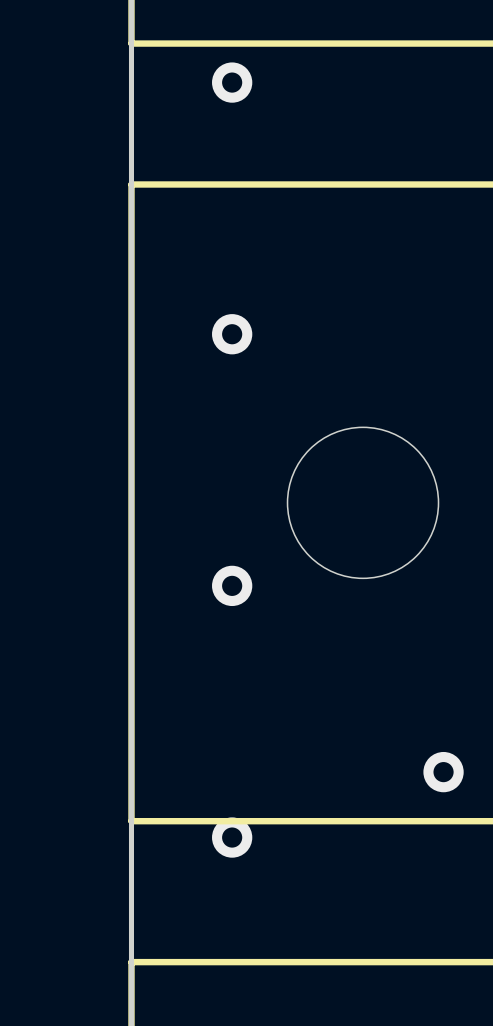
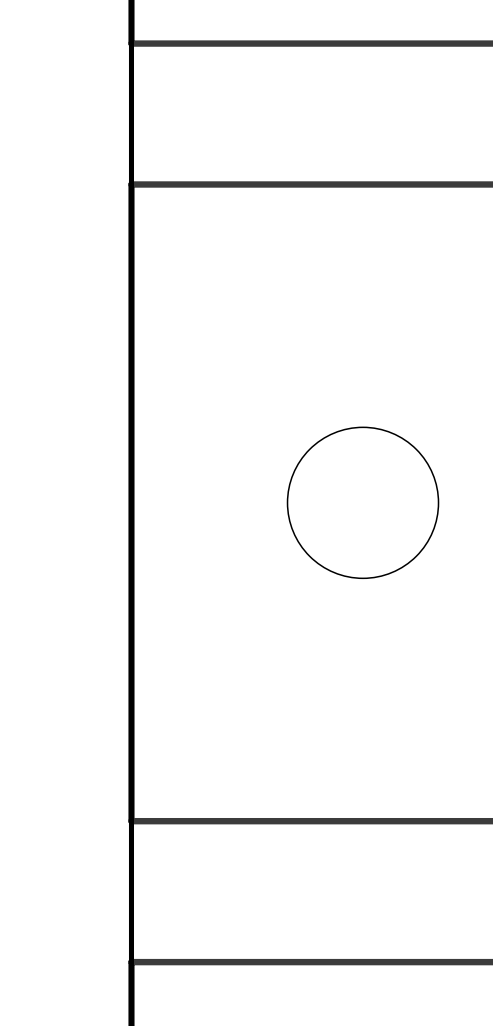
via: (232, 82) -> none
via: (232, 334) -> none
via: (232, 585) -> none
via: (443, 772) -> none
via: (232, 837) -> none

